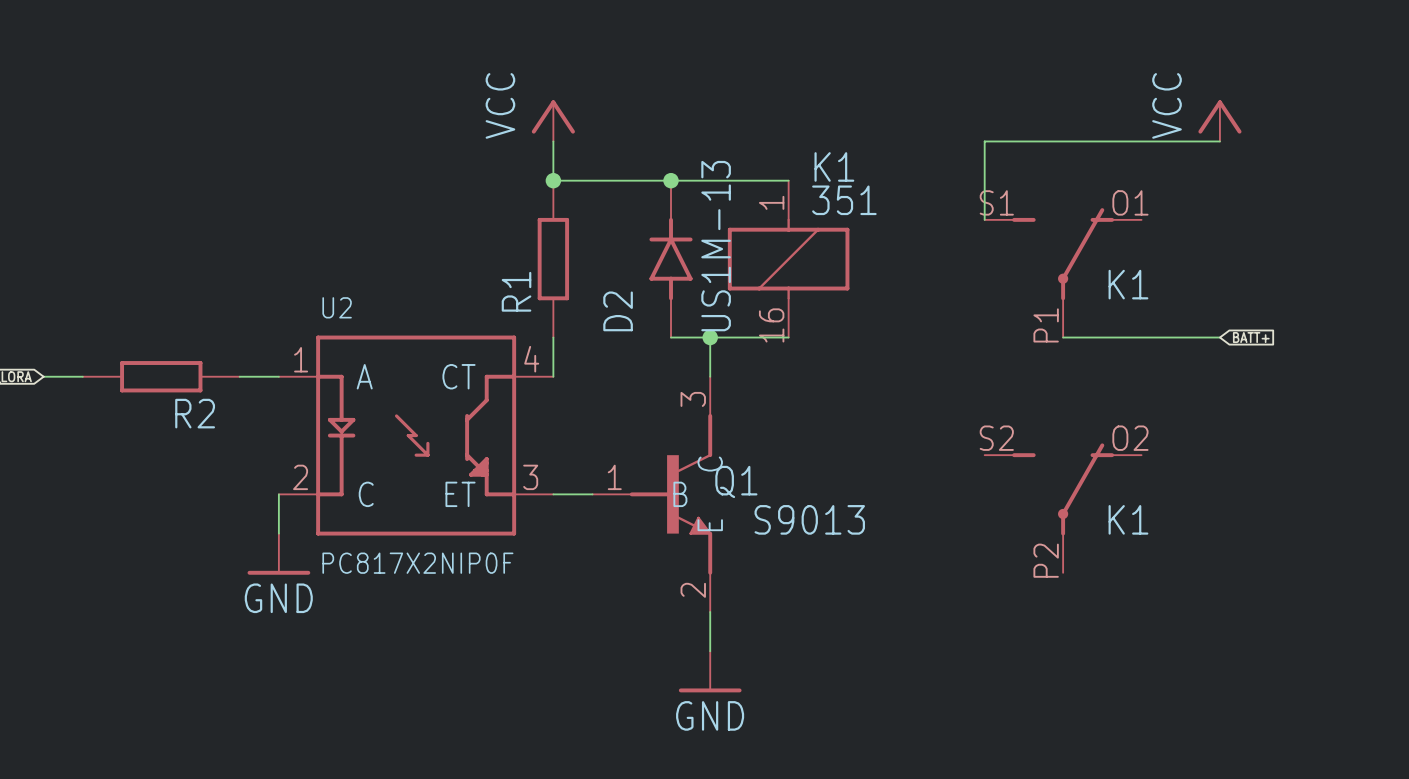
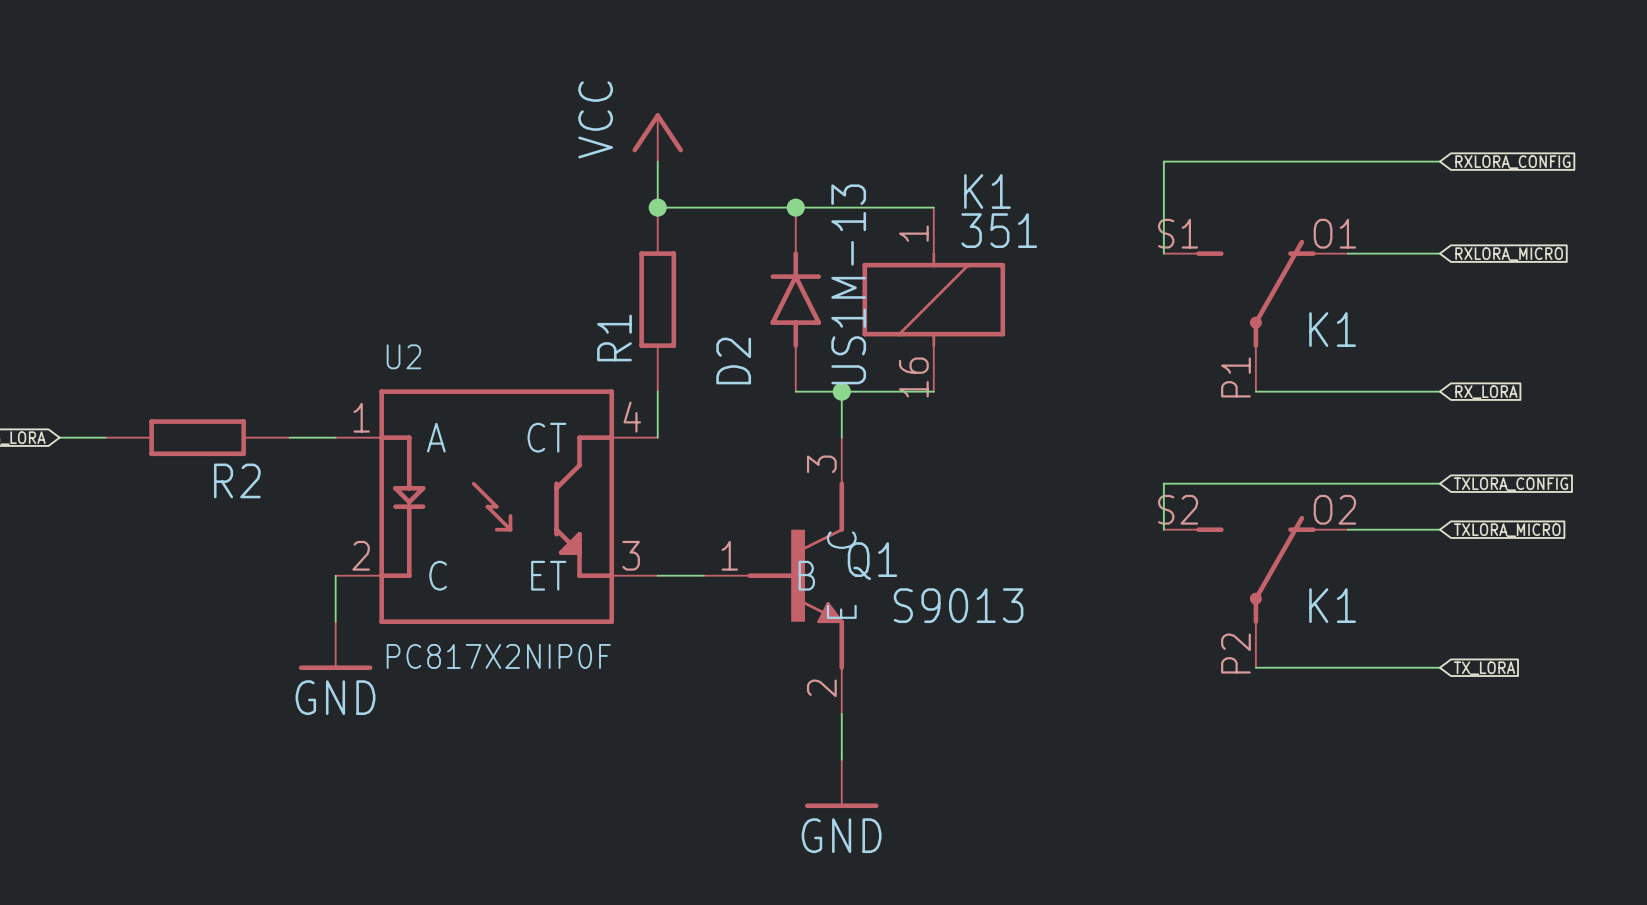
power symbol: VCC (1219, 120) -> none
global label: none -> RXLORA_CONFIG (1512, 162)
wire: none -> (1347, 253) (1439, 253)
global label: none -> RXLORA_MICRO (1509, 254)
global label: BATT+ (1251, 337) -> RX_LORA (1486, 392)
wire: none -> (1439, 483) (1163, 483) (1163, 529)
global label: none -> TXLORA_CONFIG (1511, 484)
wire: none -> (1347, 529) (1439, 529)
global label: none -> TXLORA_MICRO (1507, 530)
wire: none -> (1255, 667) (1439, 667)
global label: none -> TX_LORA (1484, 668)

